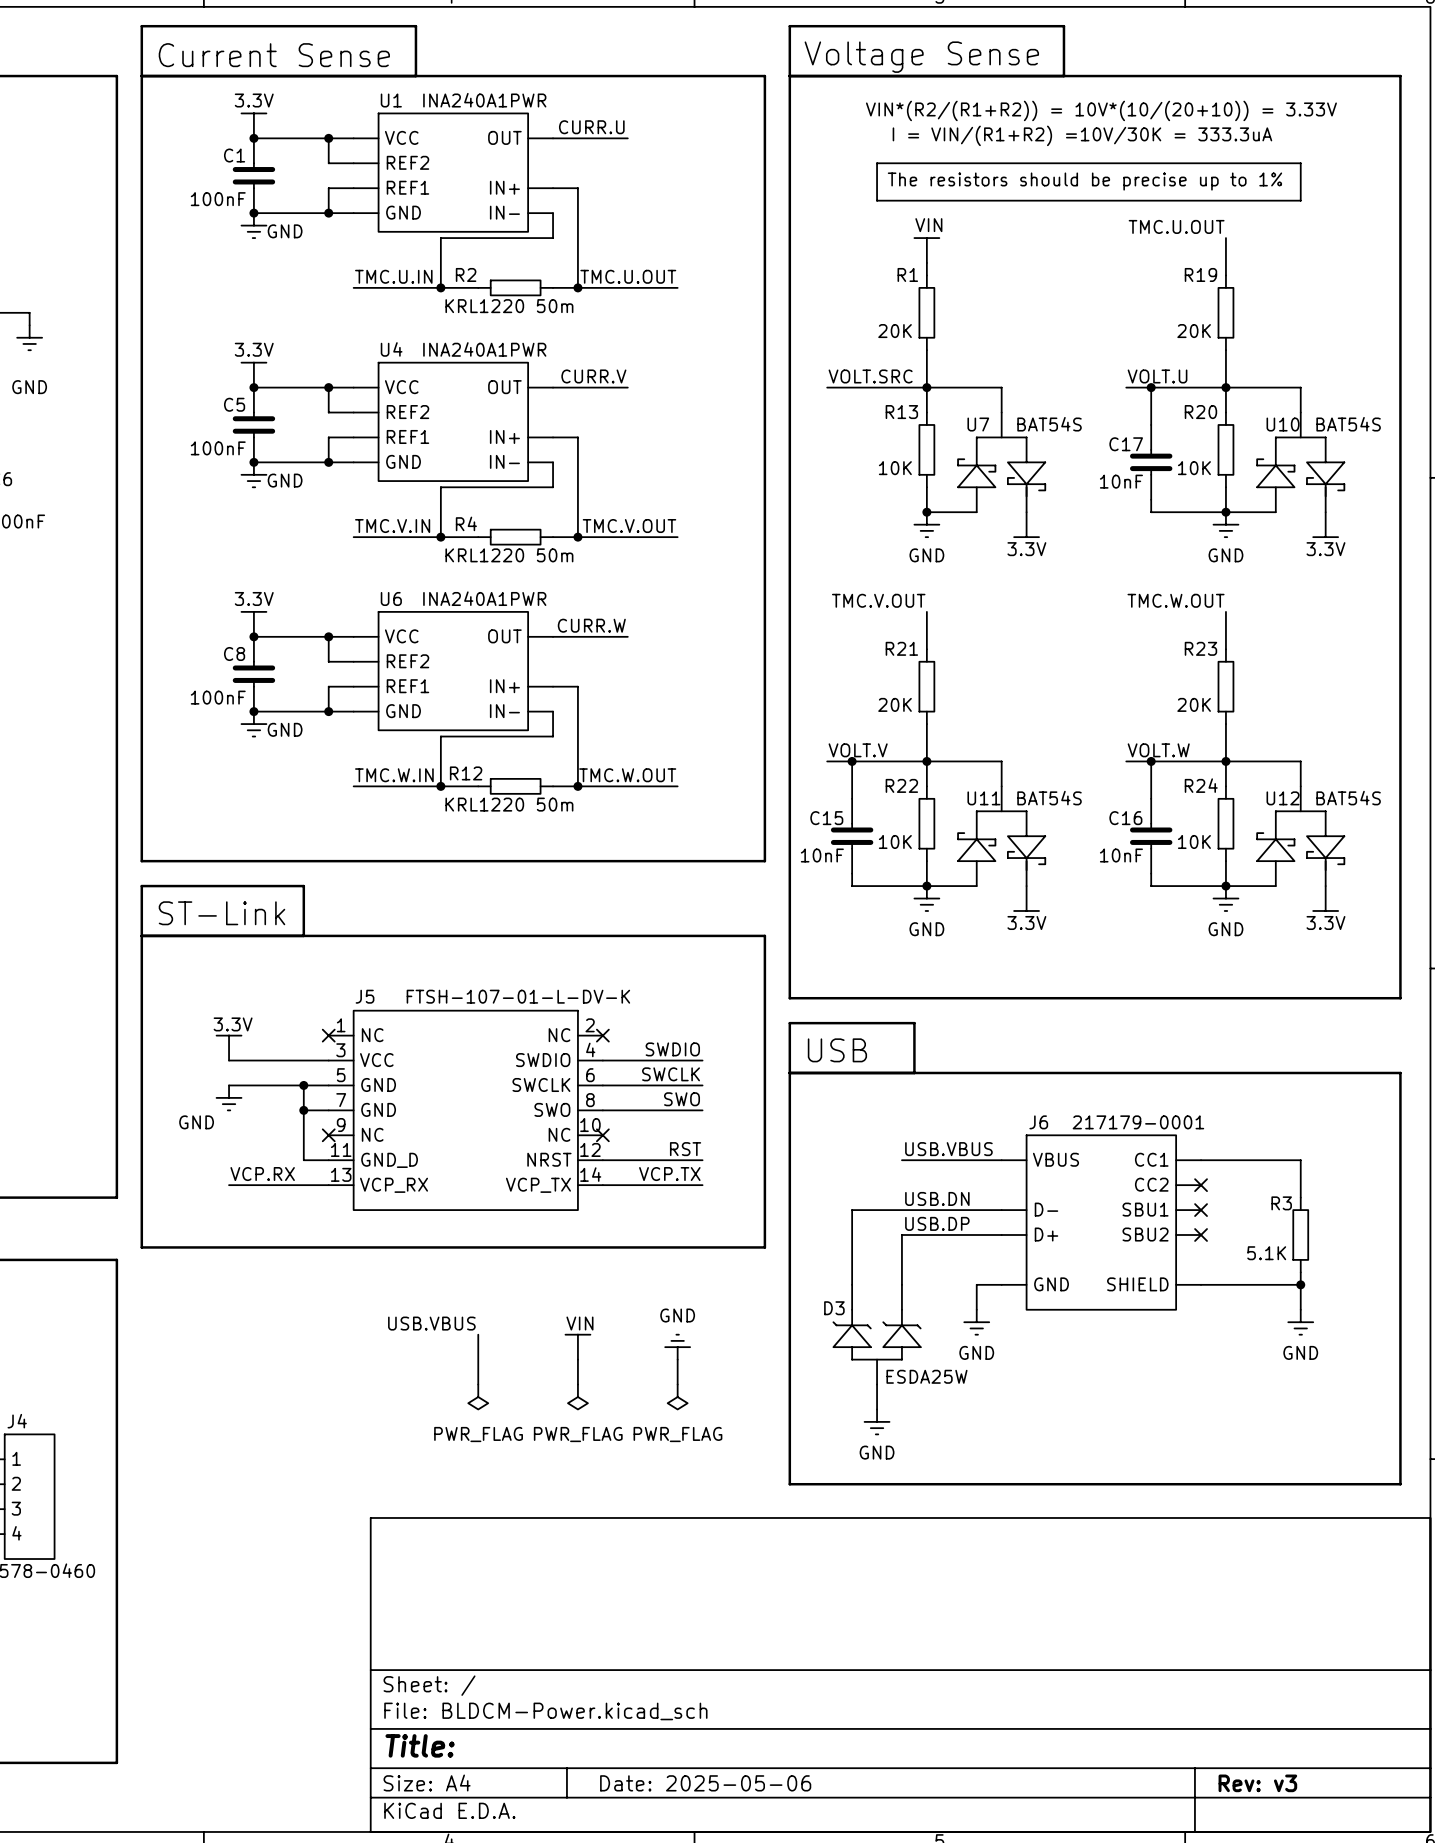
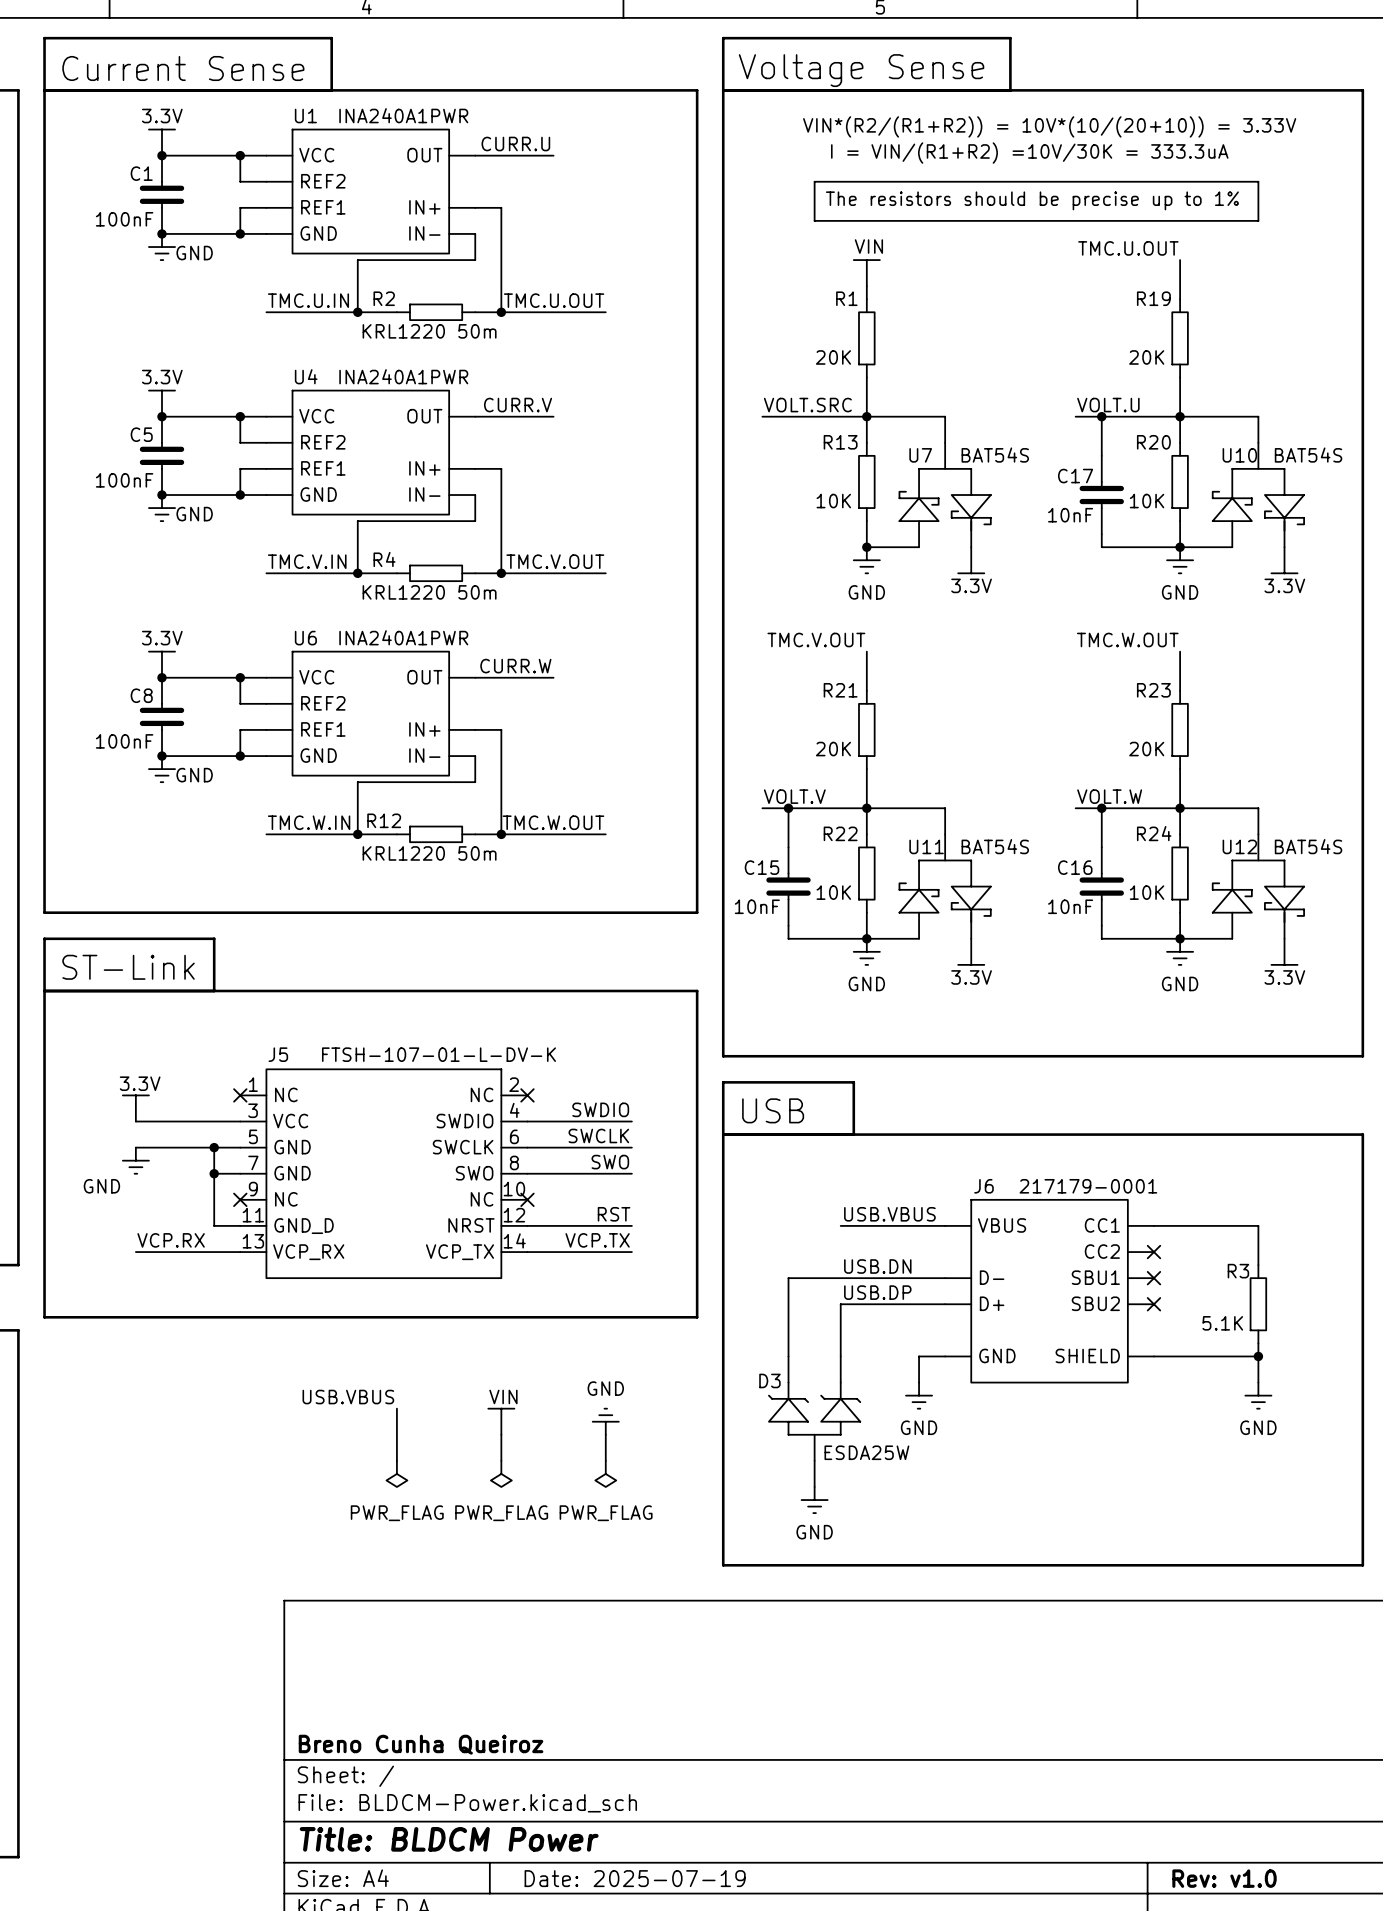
title block: none -> Breno Cunha Queiroz (421, 1744)
title block: Title: (420, 1745) -> Title: BLDCM Power (449, 1839)
title block: Date: 2025-05-06 (705, 1783) -> Date: 2025-07-19 (635, 1878)
title block: Rev: v3 (1257, 1783) -> Rev: v1.0 (1224, 1878)

